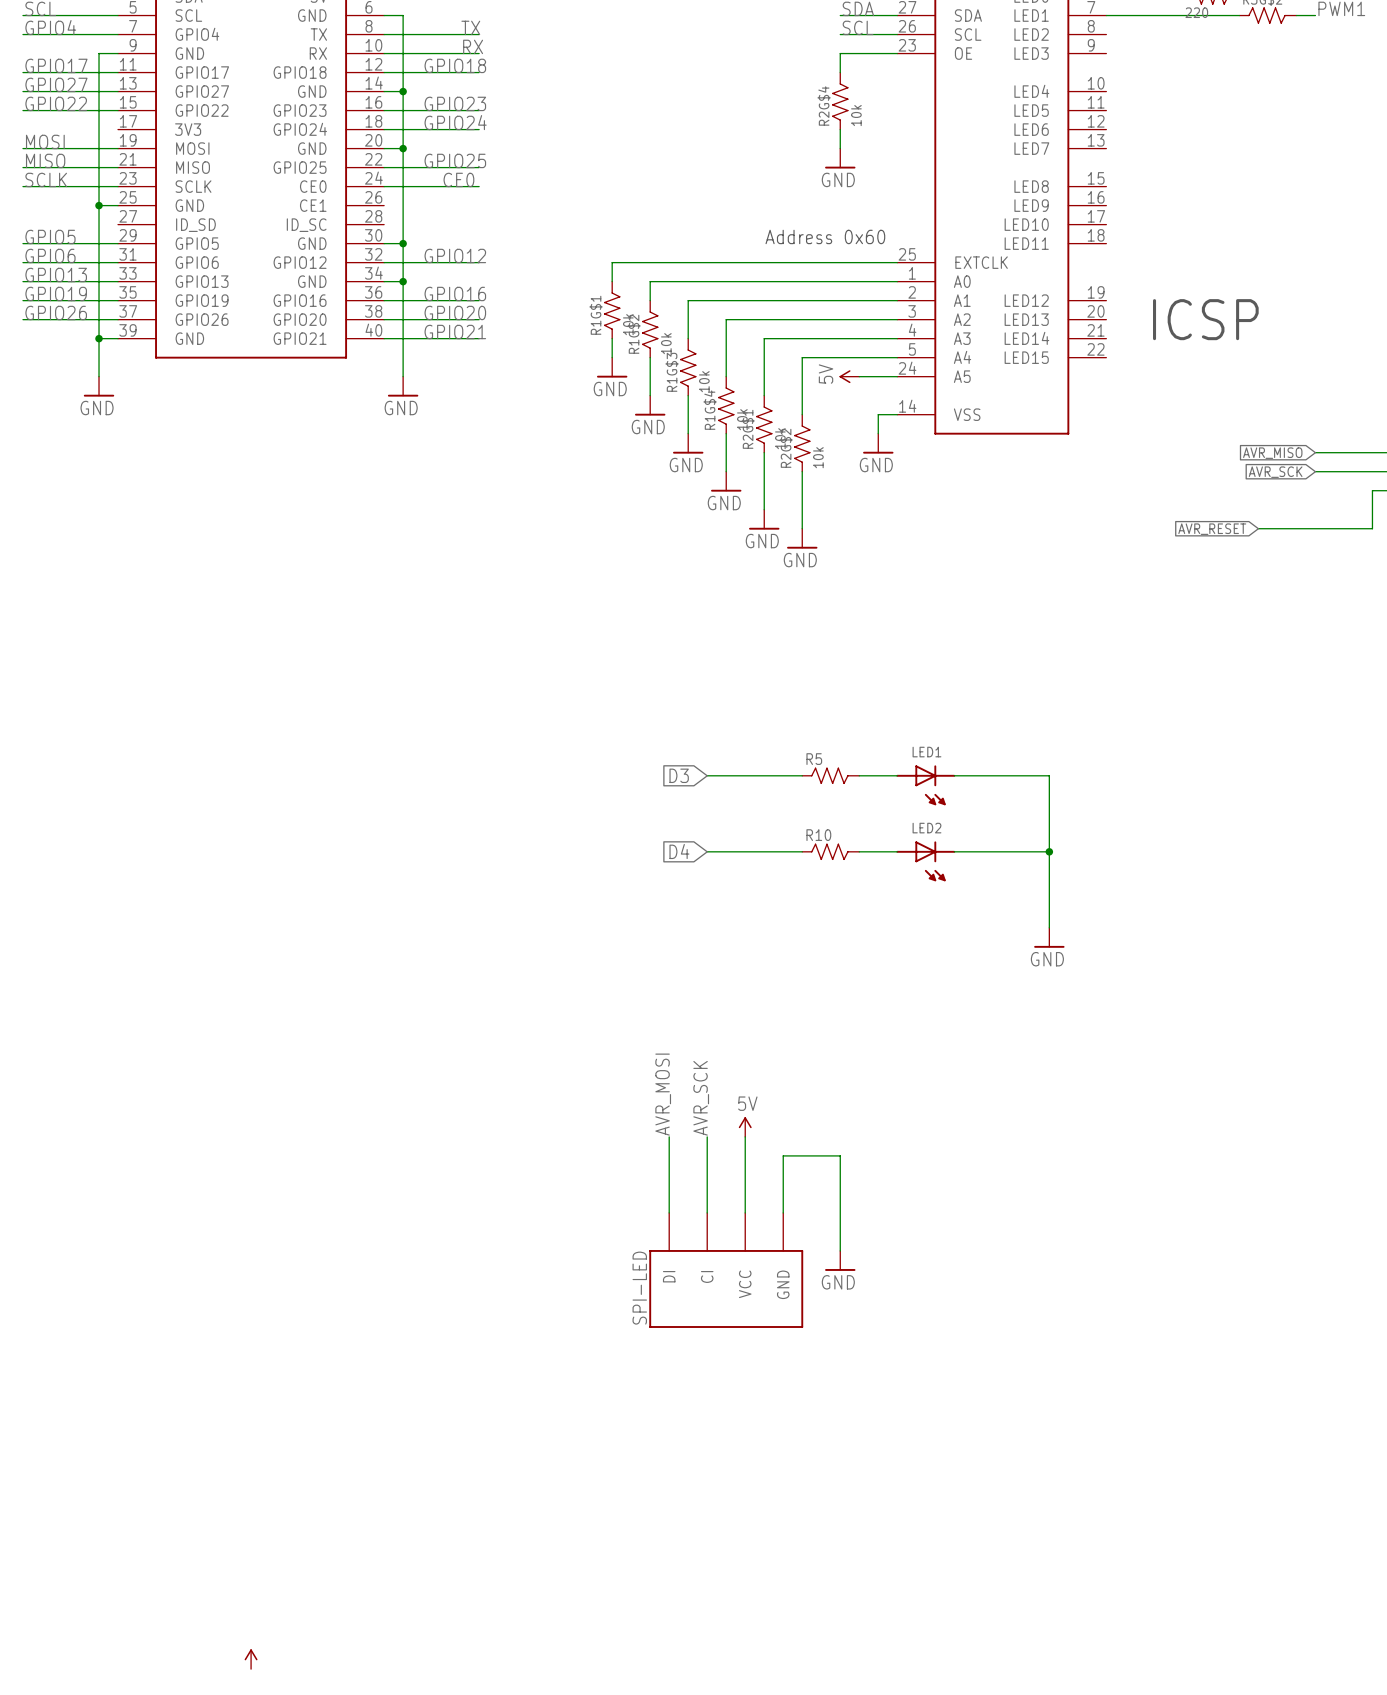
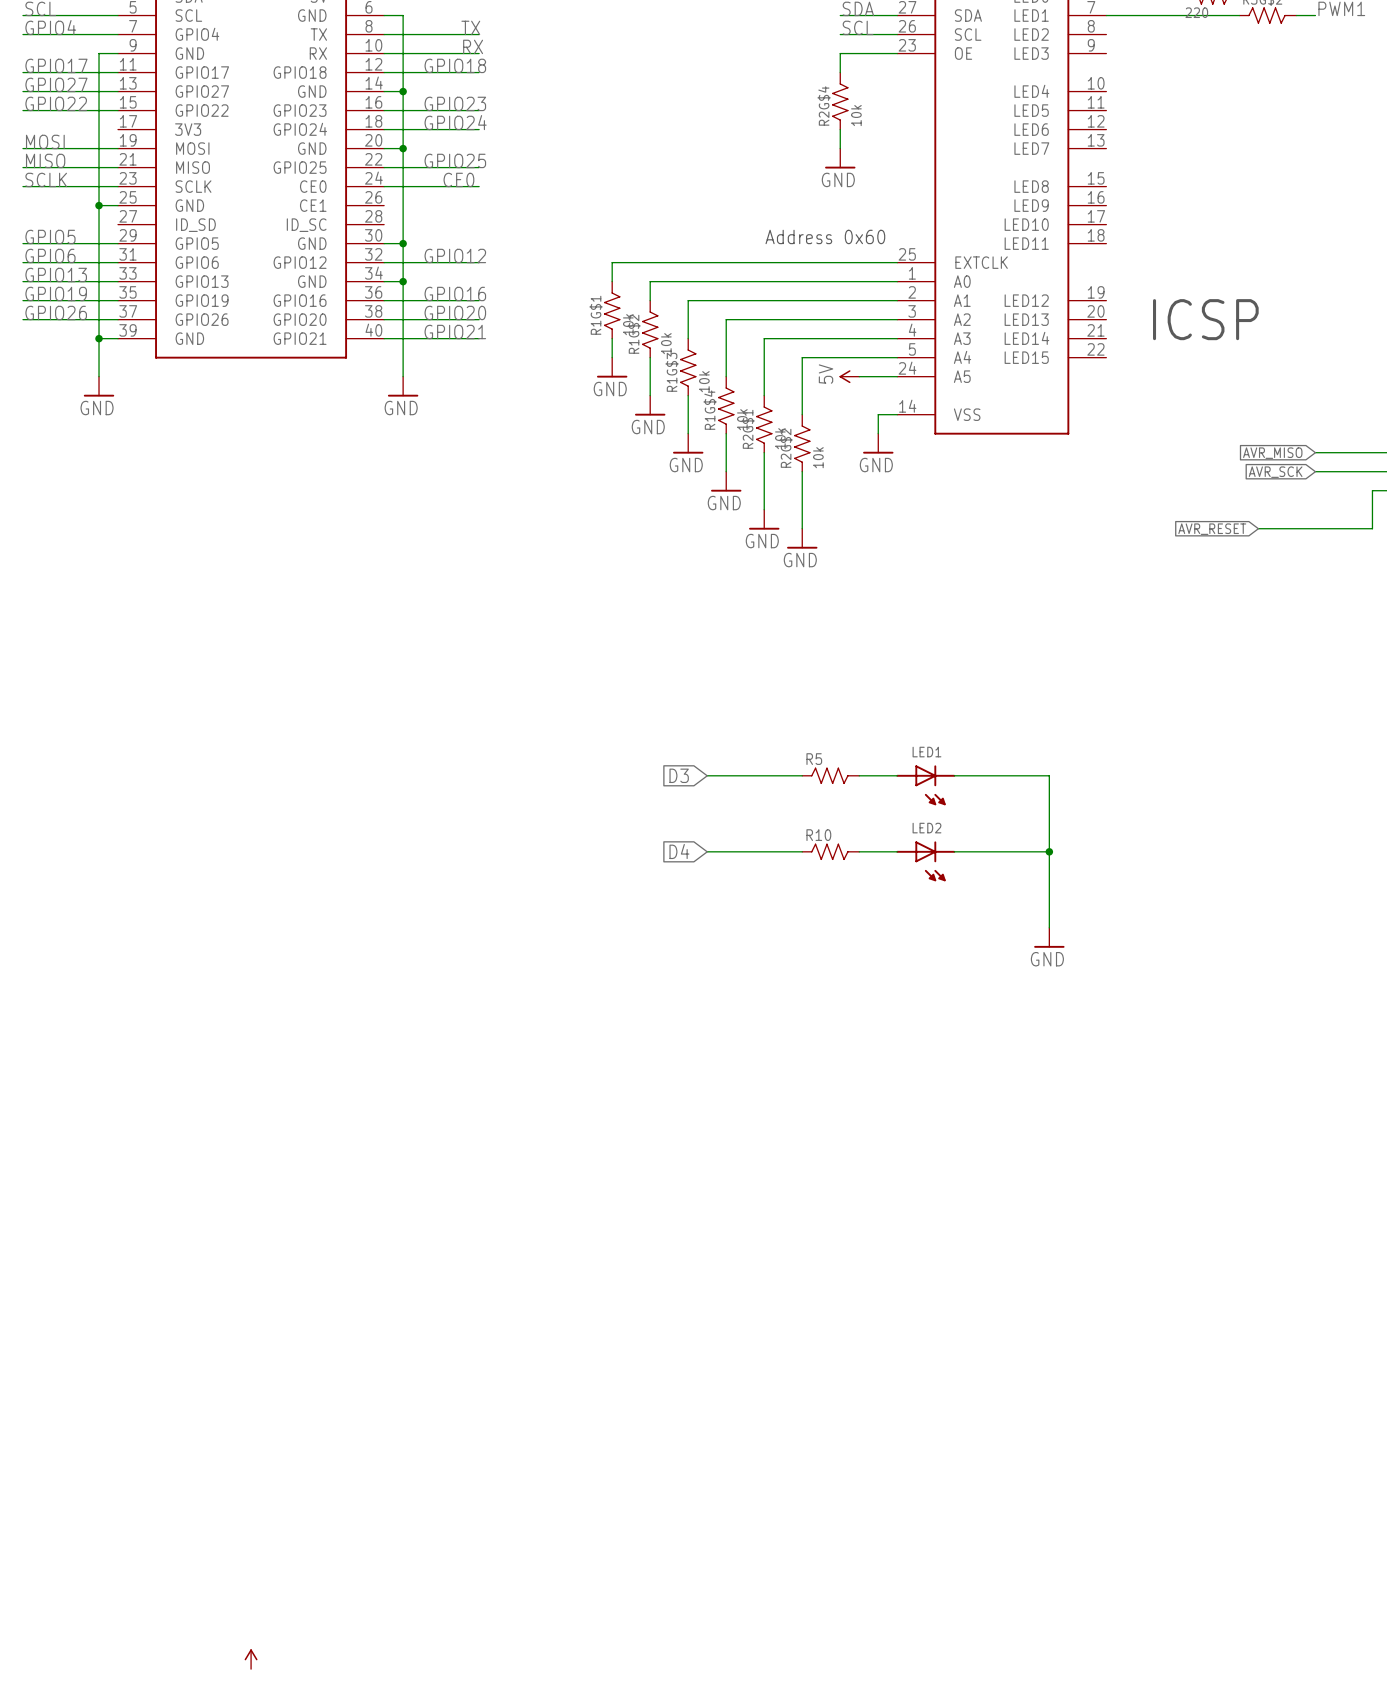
label: AVR_MOSI (663, 1094) -> none
label: AVR_SCK (701, 1098) -> none
power symbol: 5V (745, 1127) -> none
wire: (669, 1136) (669, 1212) -> none
wire: (707, 1136) (707, 1212) -> none
wire: (745, 1136) (745, 1212) -> none
wire: (783, 1212) (783, 1155) (840, 1155) (840, 1250) -> none
power symbol: GND (840, 1260) -> none
SPI-LED: (726, 1270) -> none

